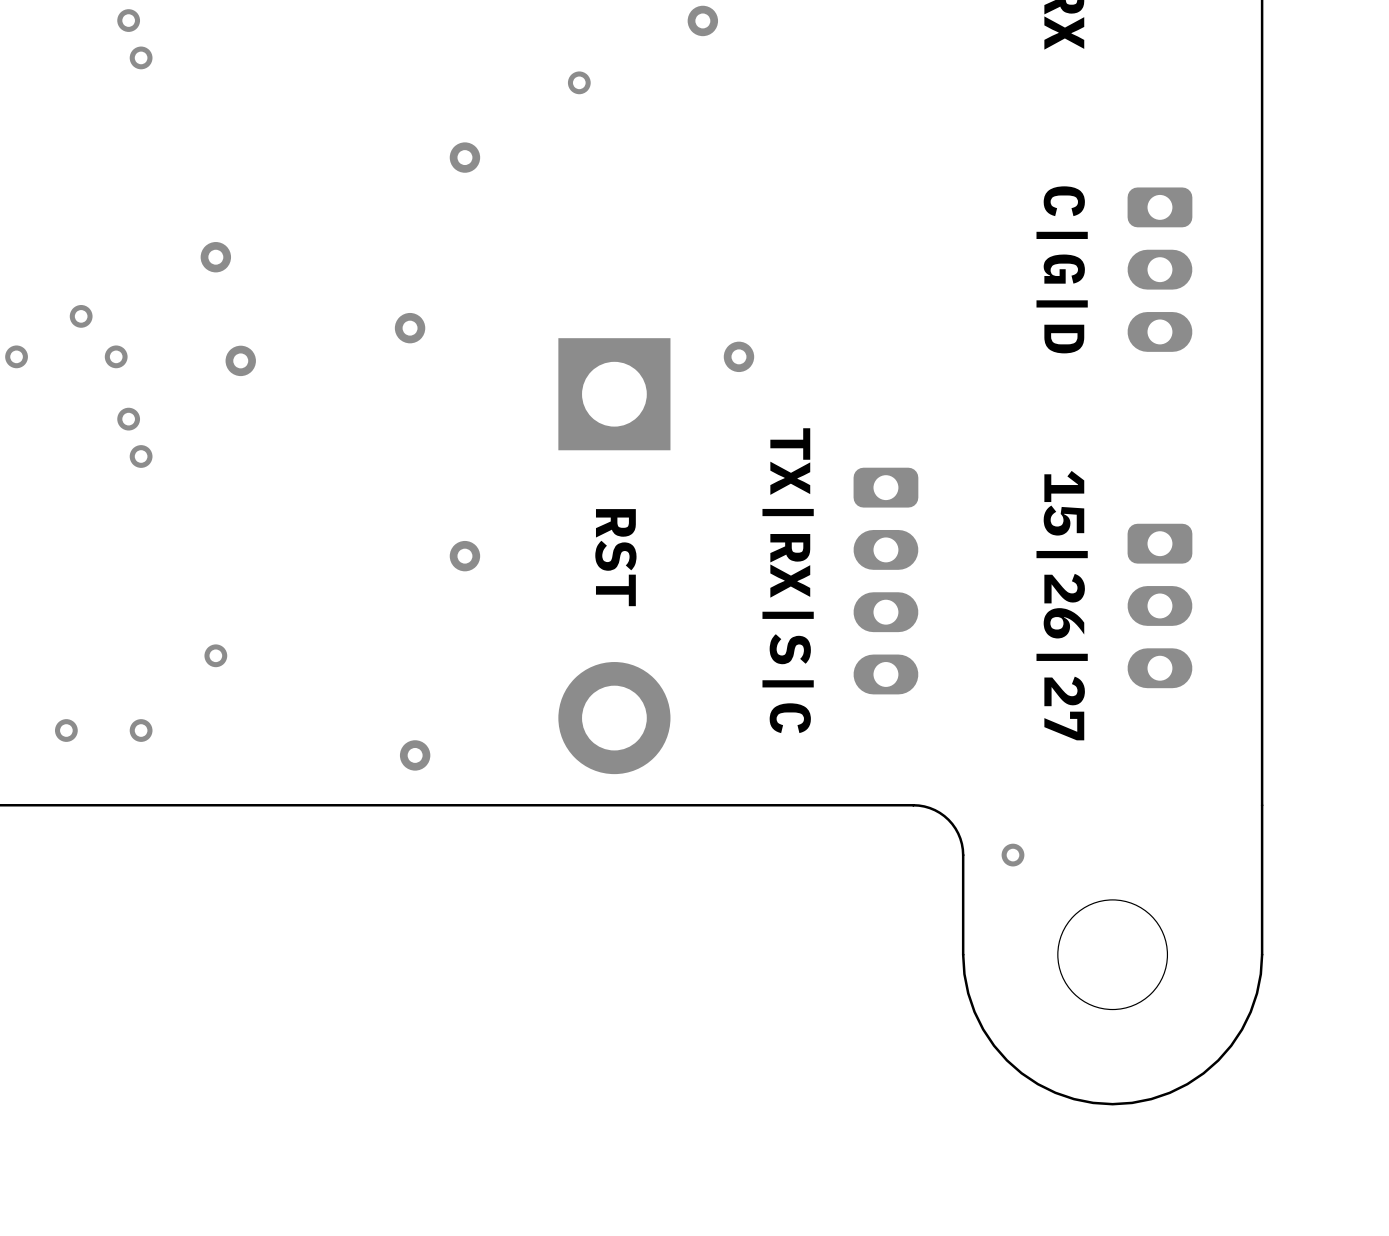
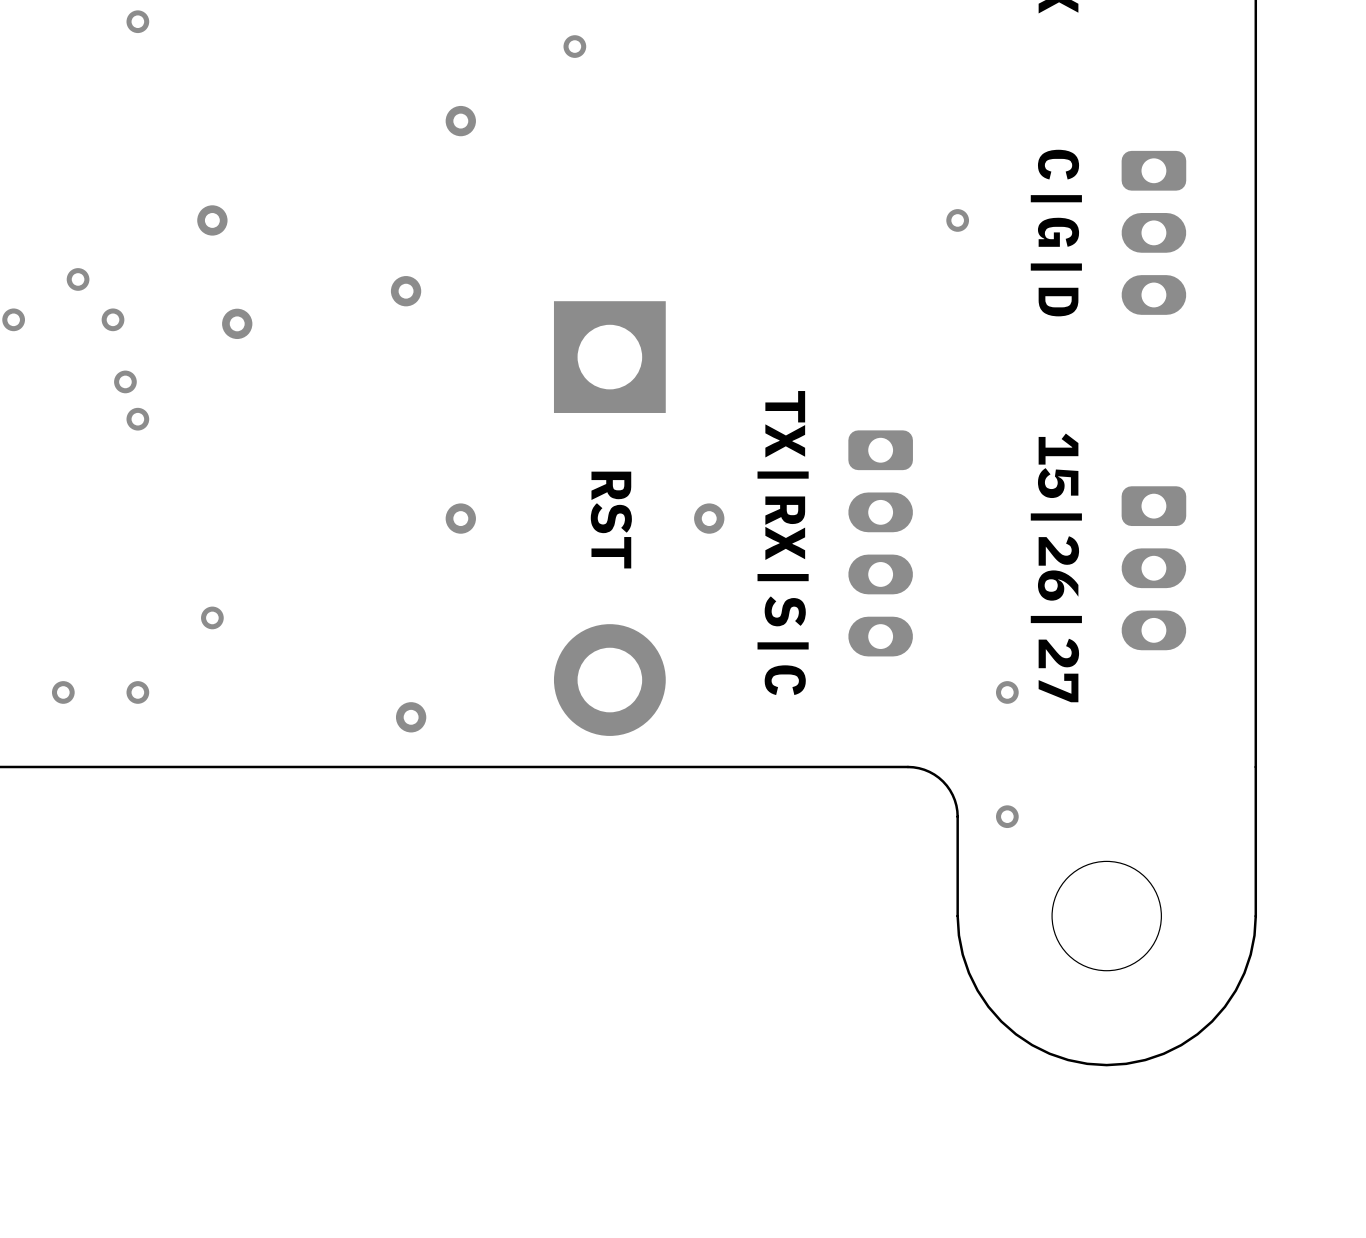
via: none -> (957, 220)
via position: (738, 356) -> (709, 518)
via: none -> (1007, 692)

